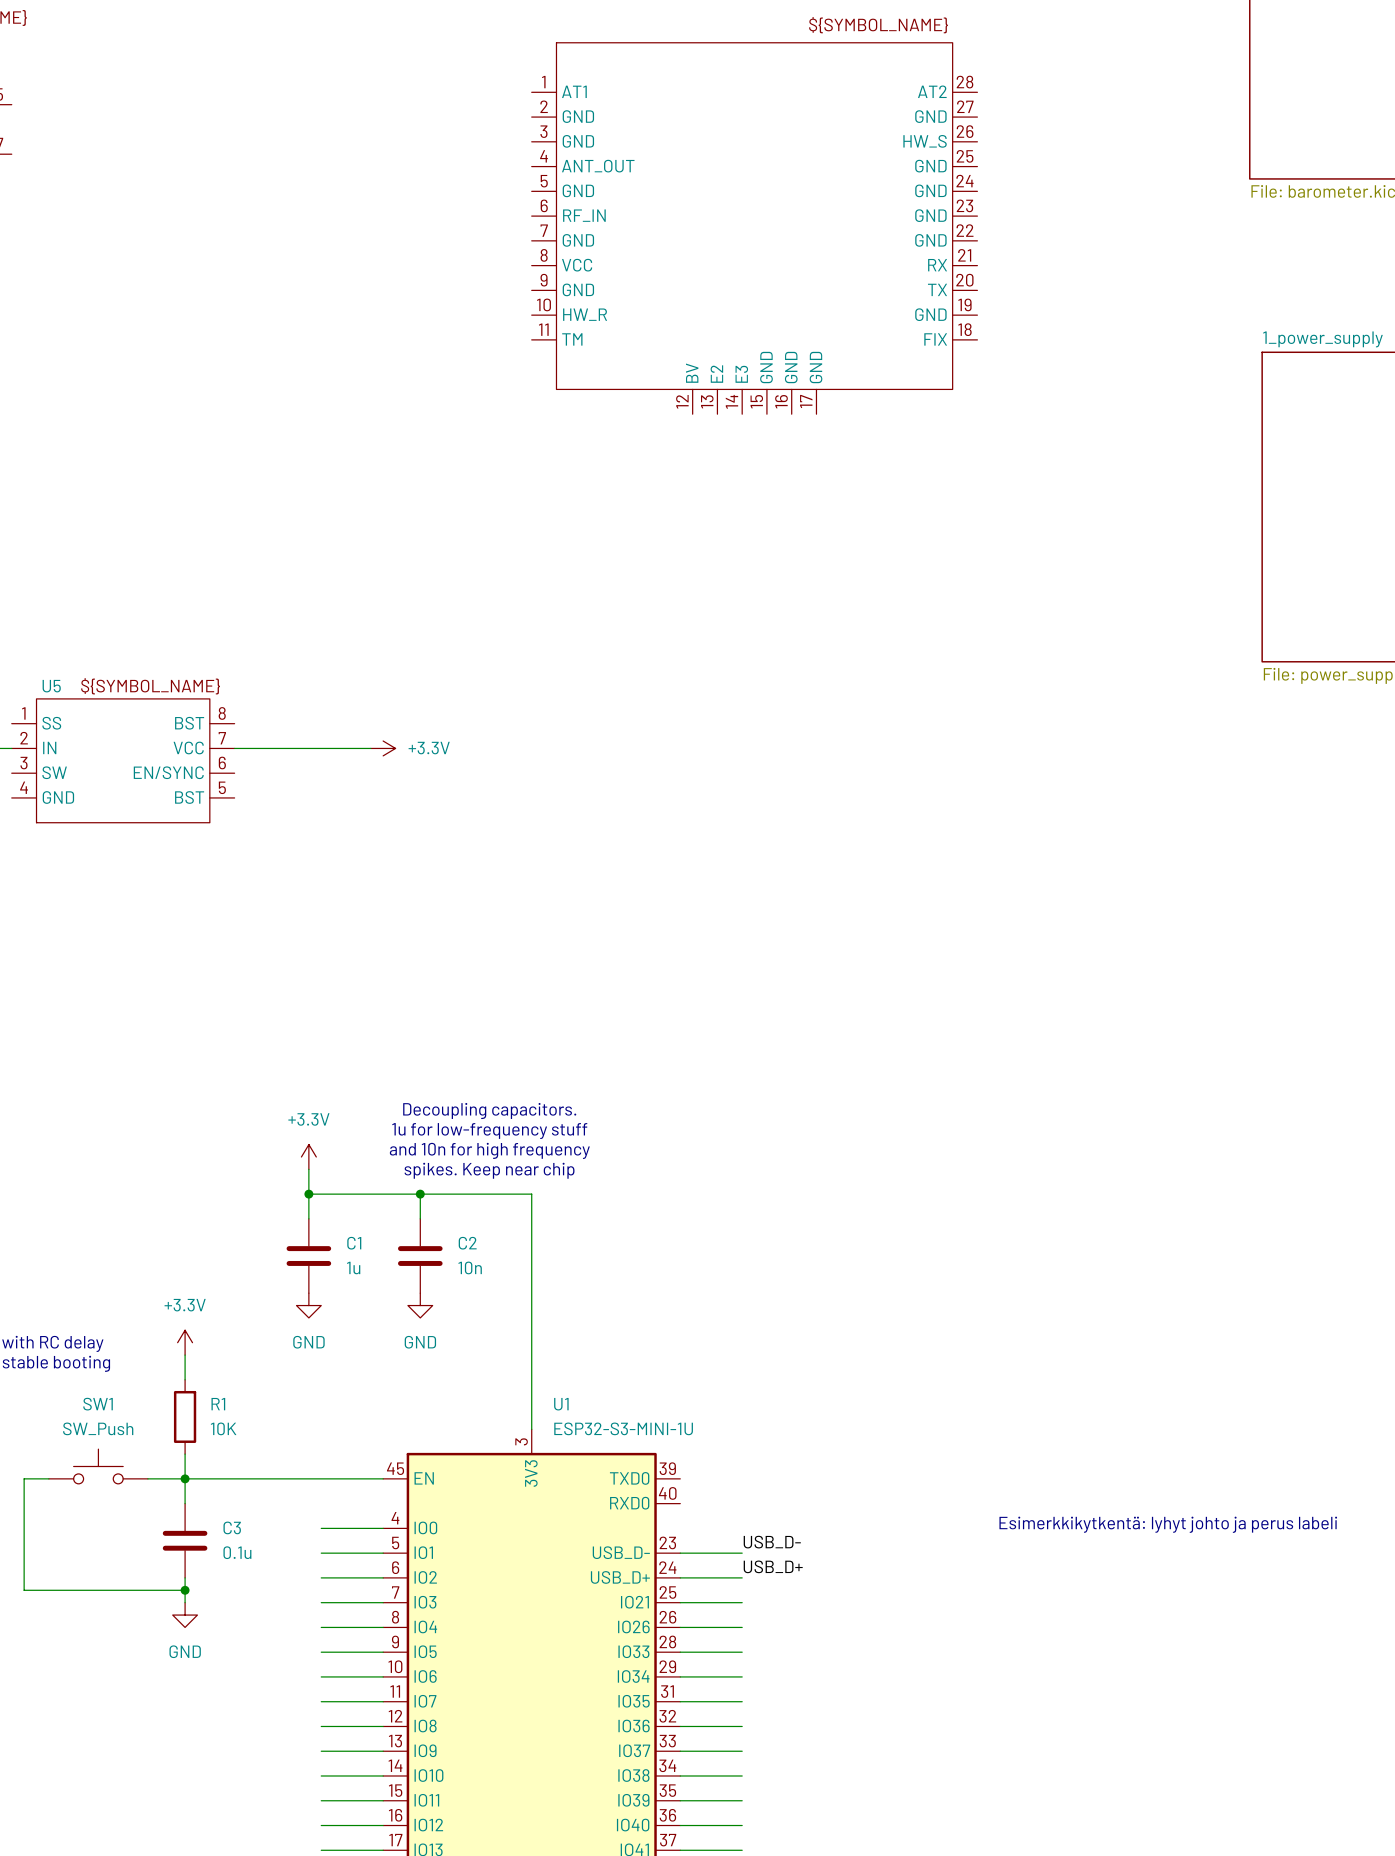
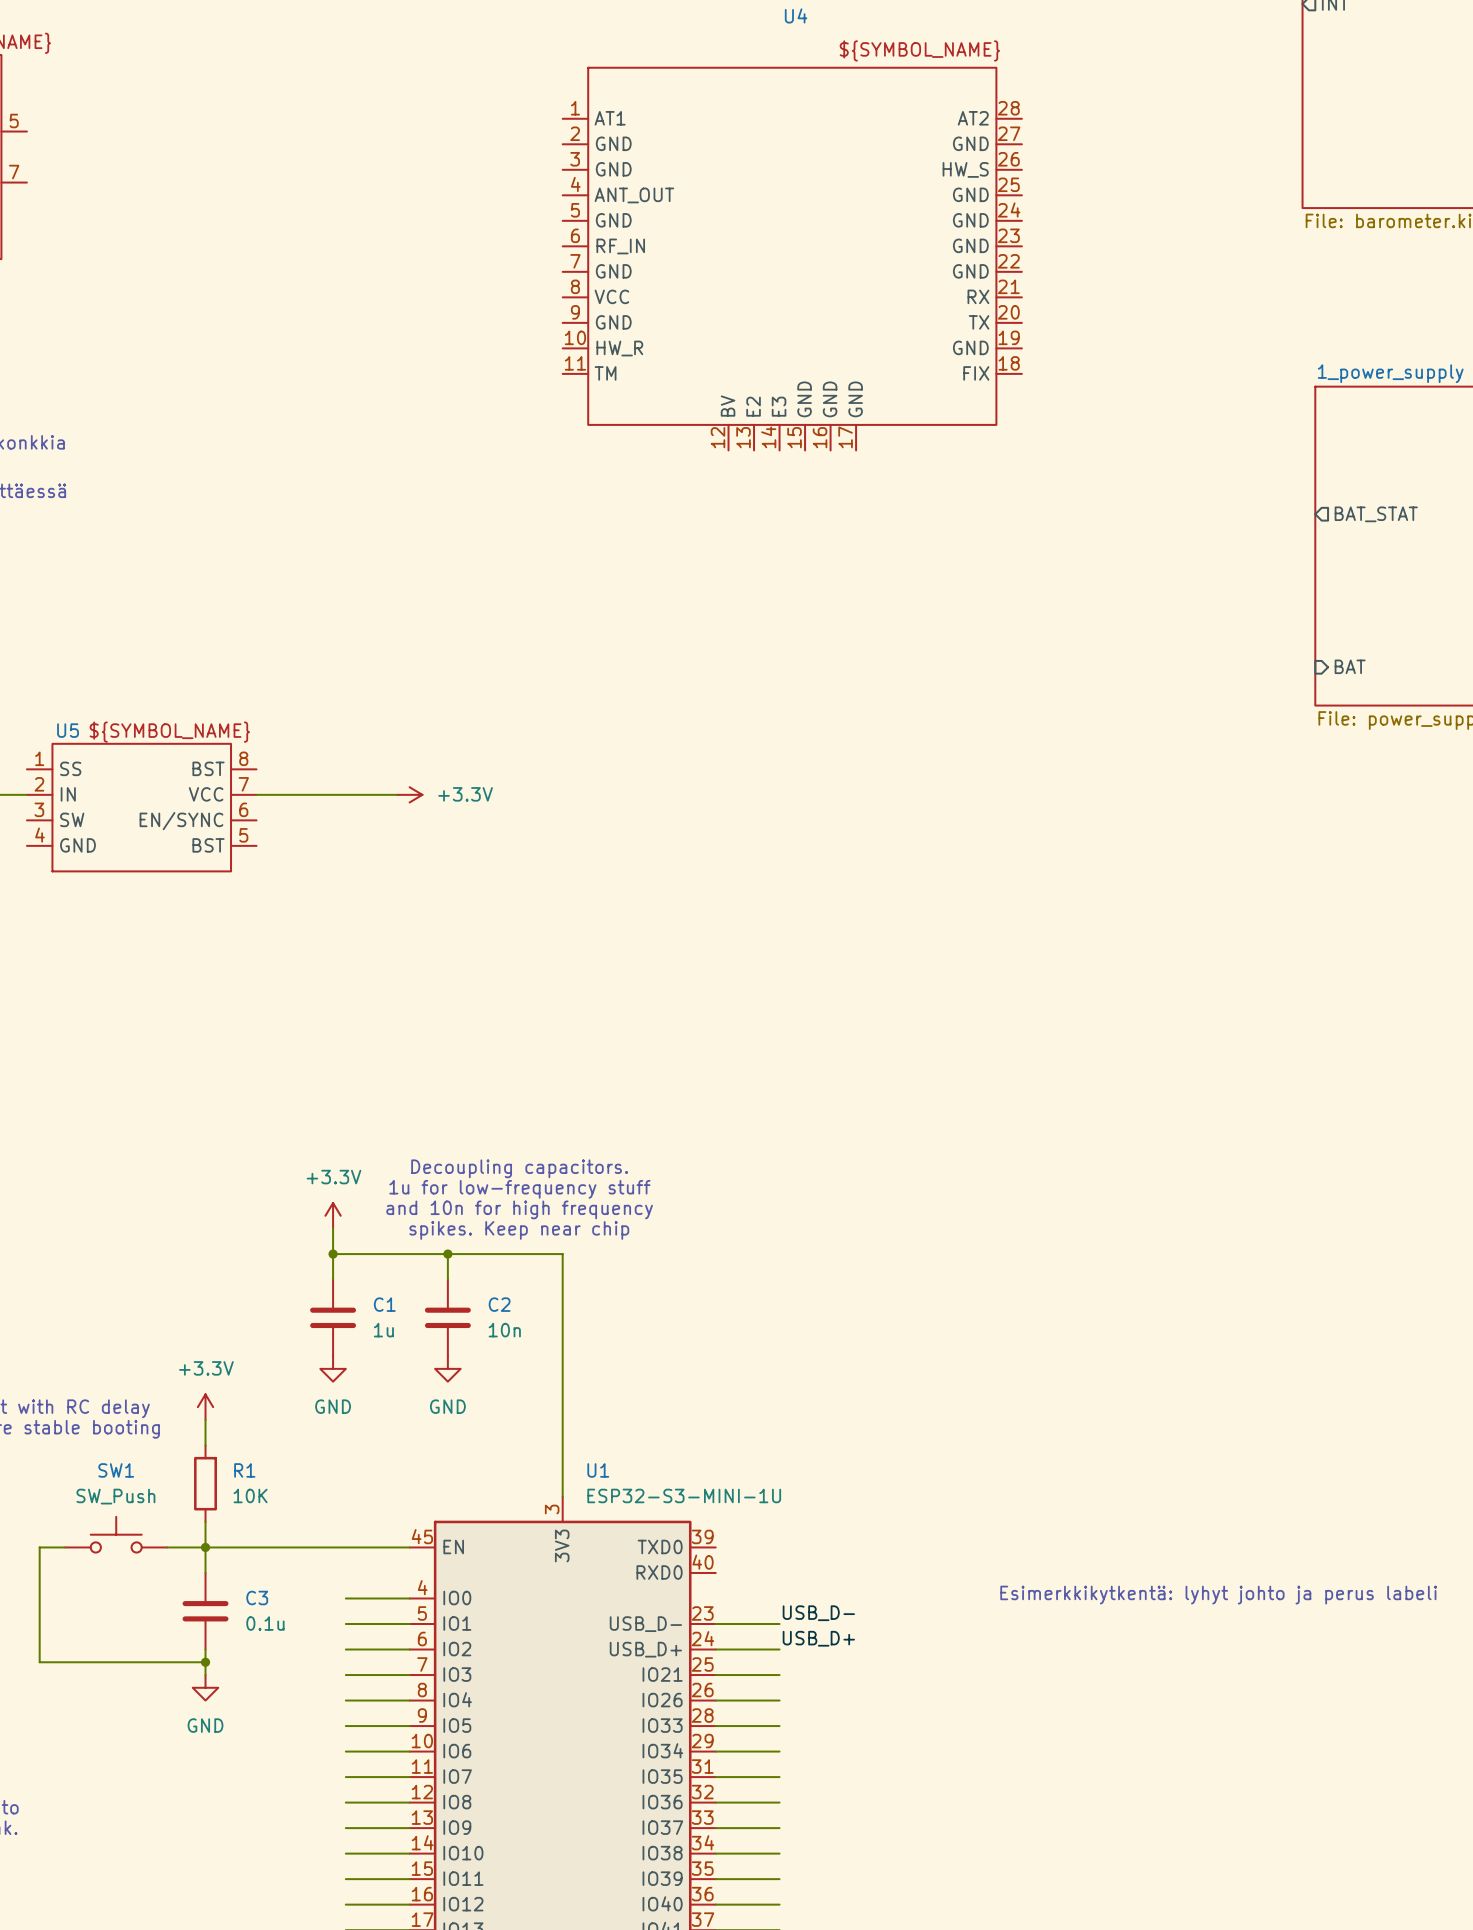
sheet pin: none -> BAT_STAT (1376, 514)
sheet pin: none -> BAT (1350, 666)

